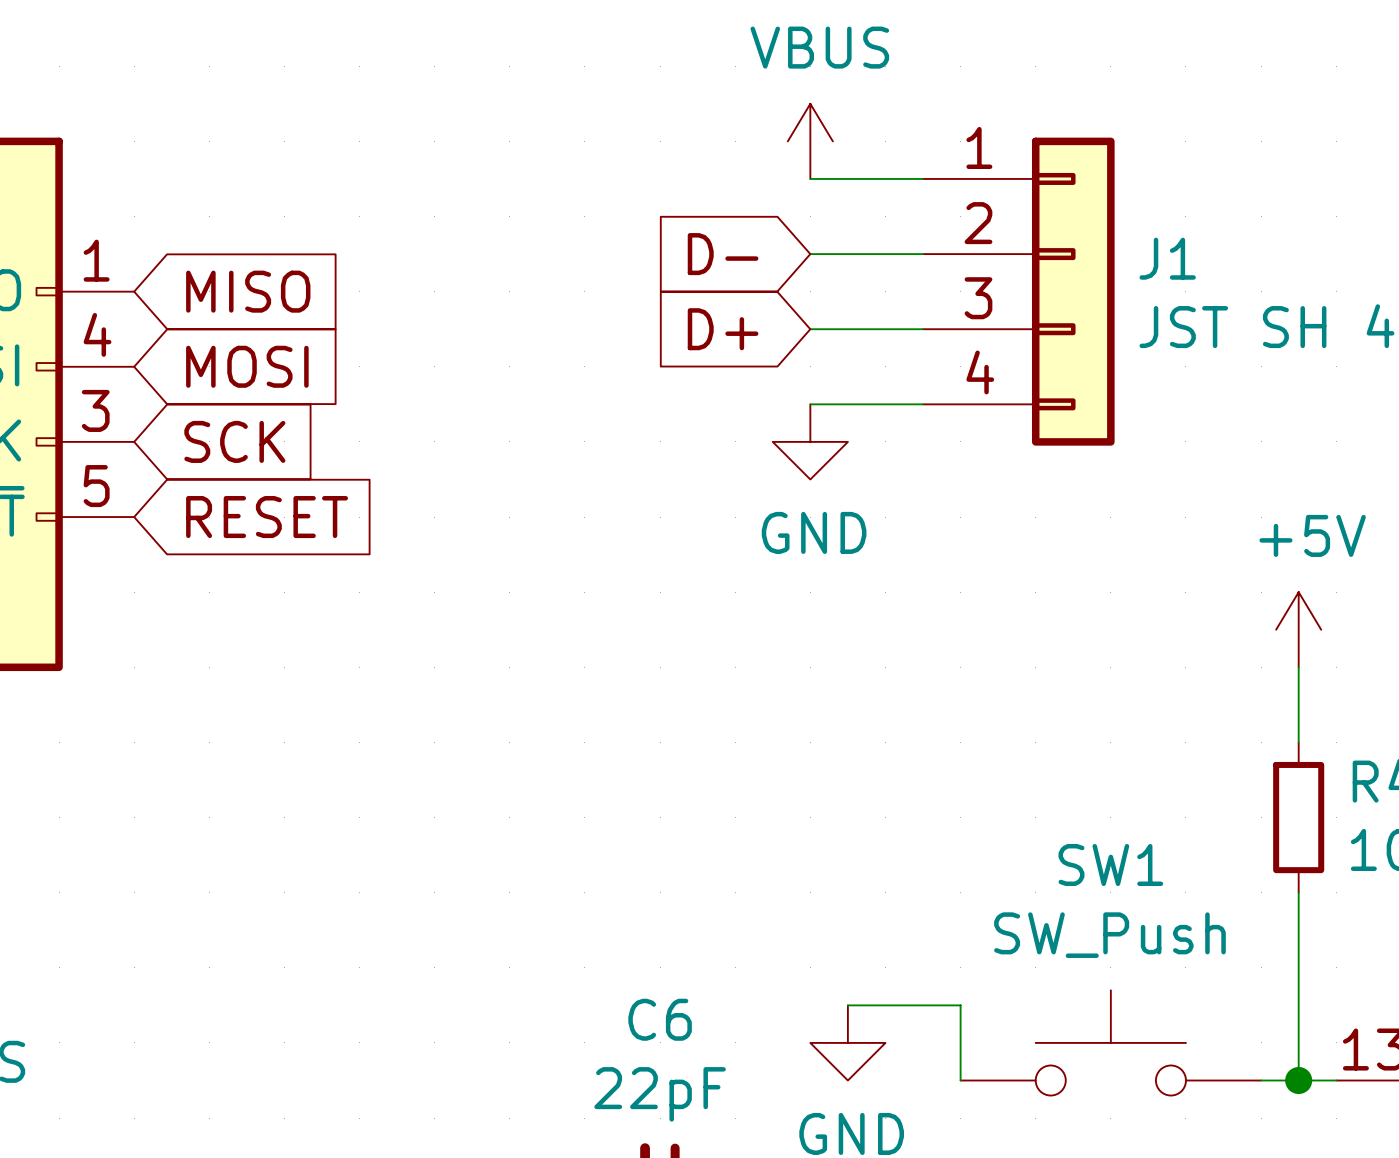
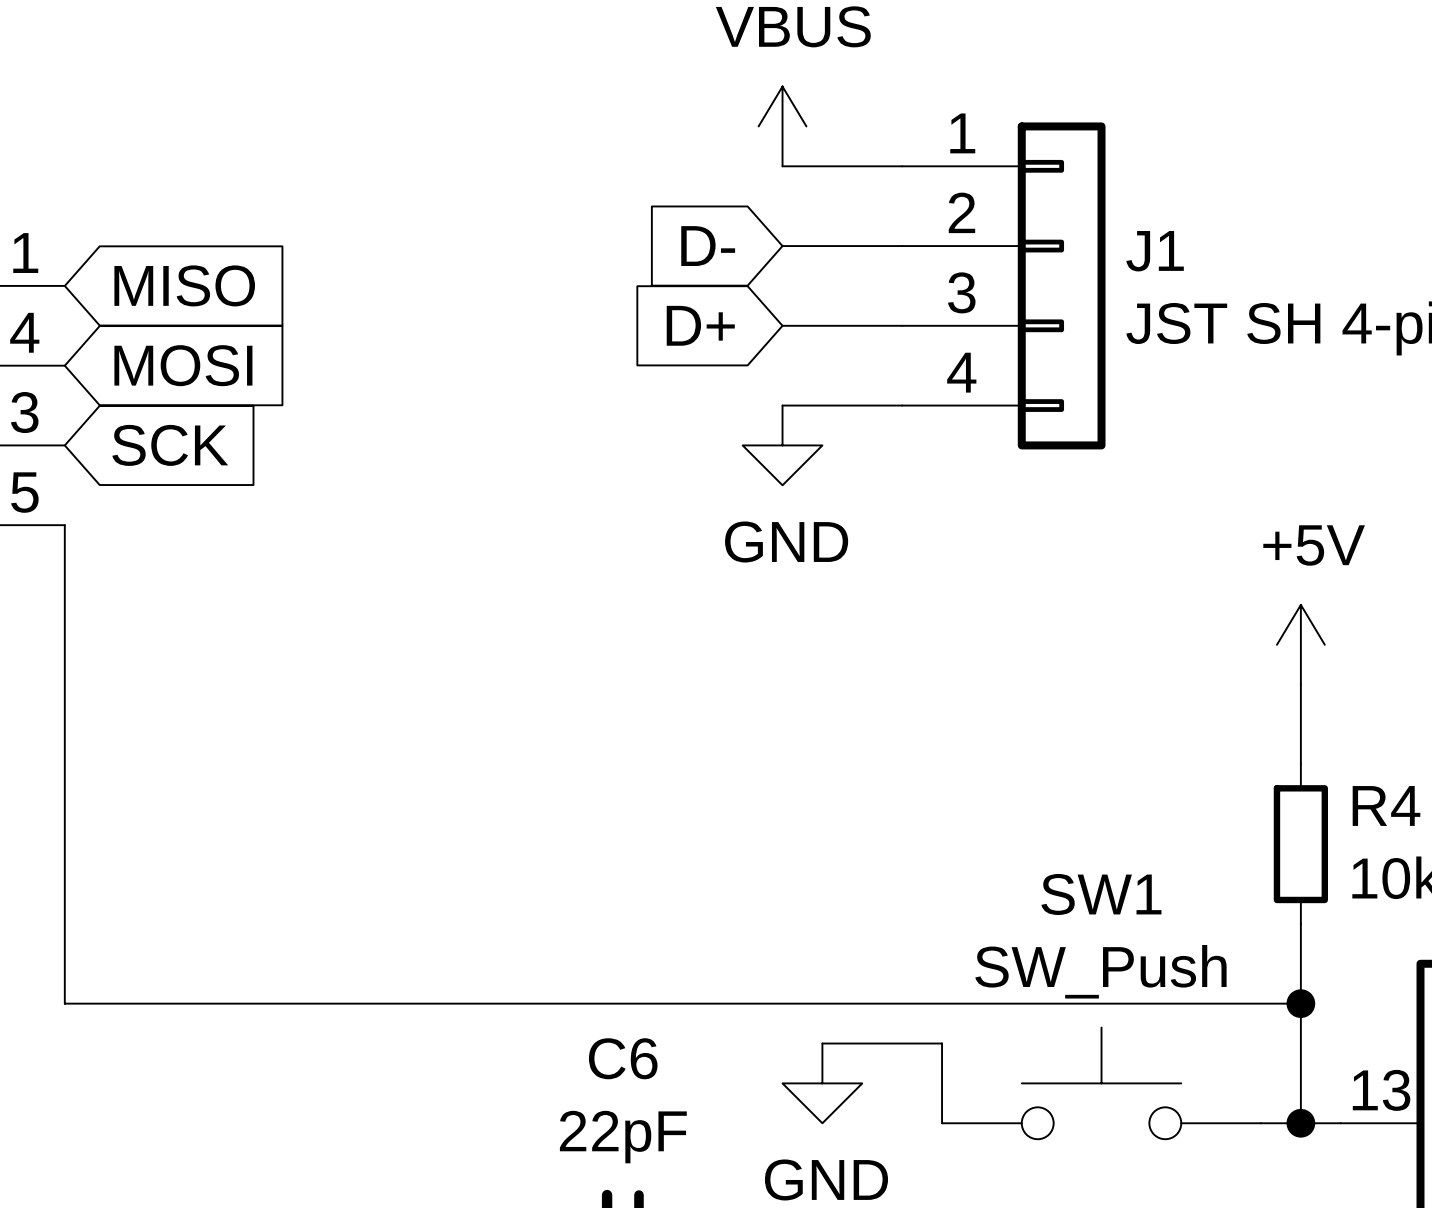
wire: none -> (64, 525) (64, 1003) (1300, 1003)
global label: RESET (267, 517) -> none
junction: none -> (1300, 1003)

